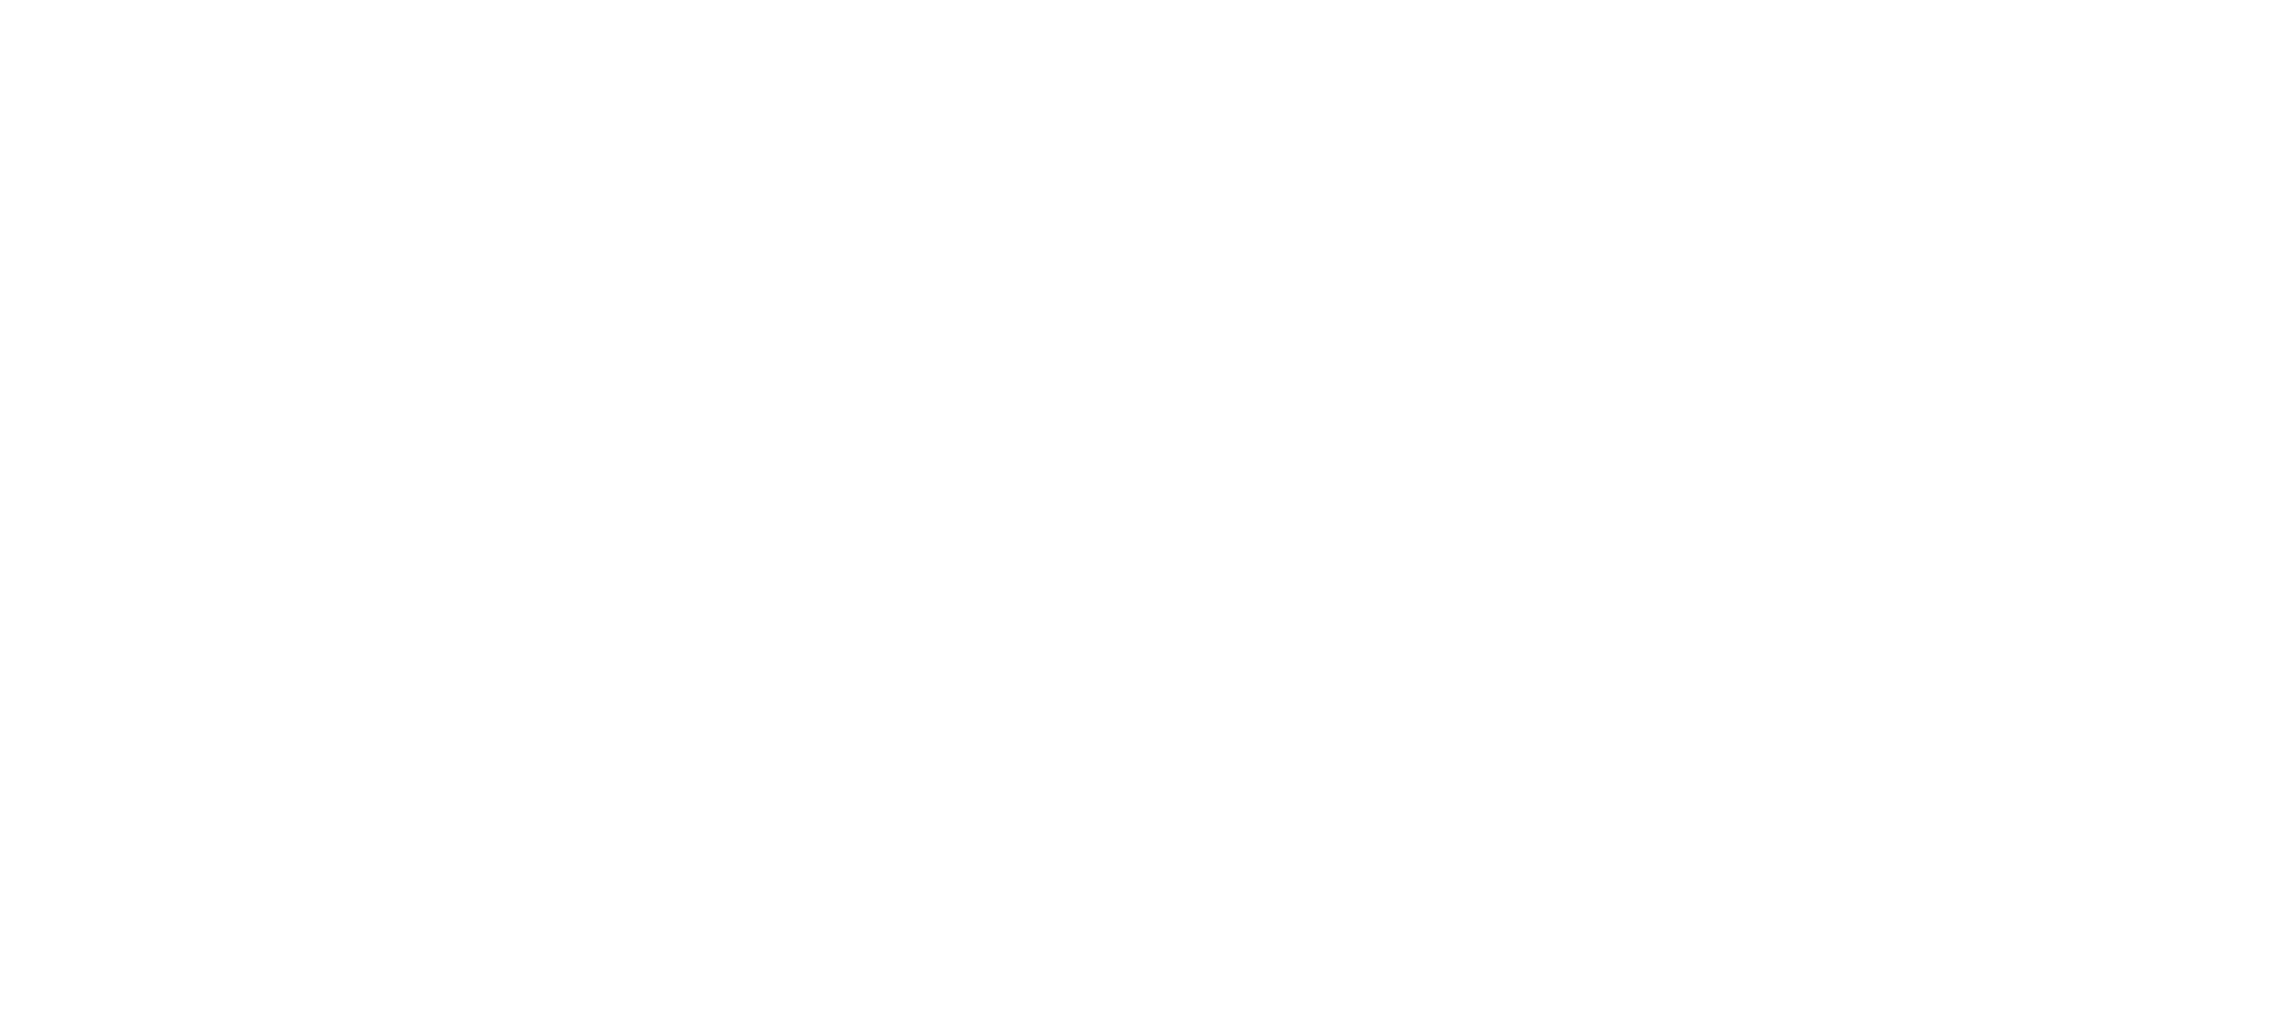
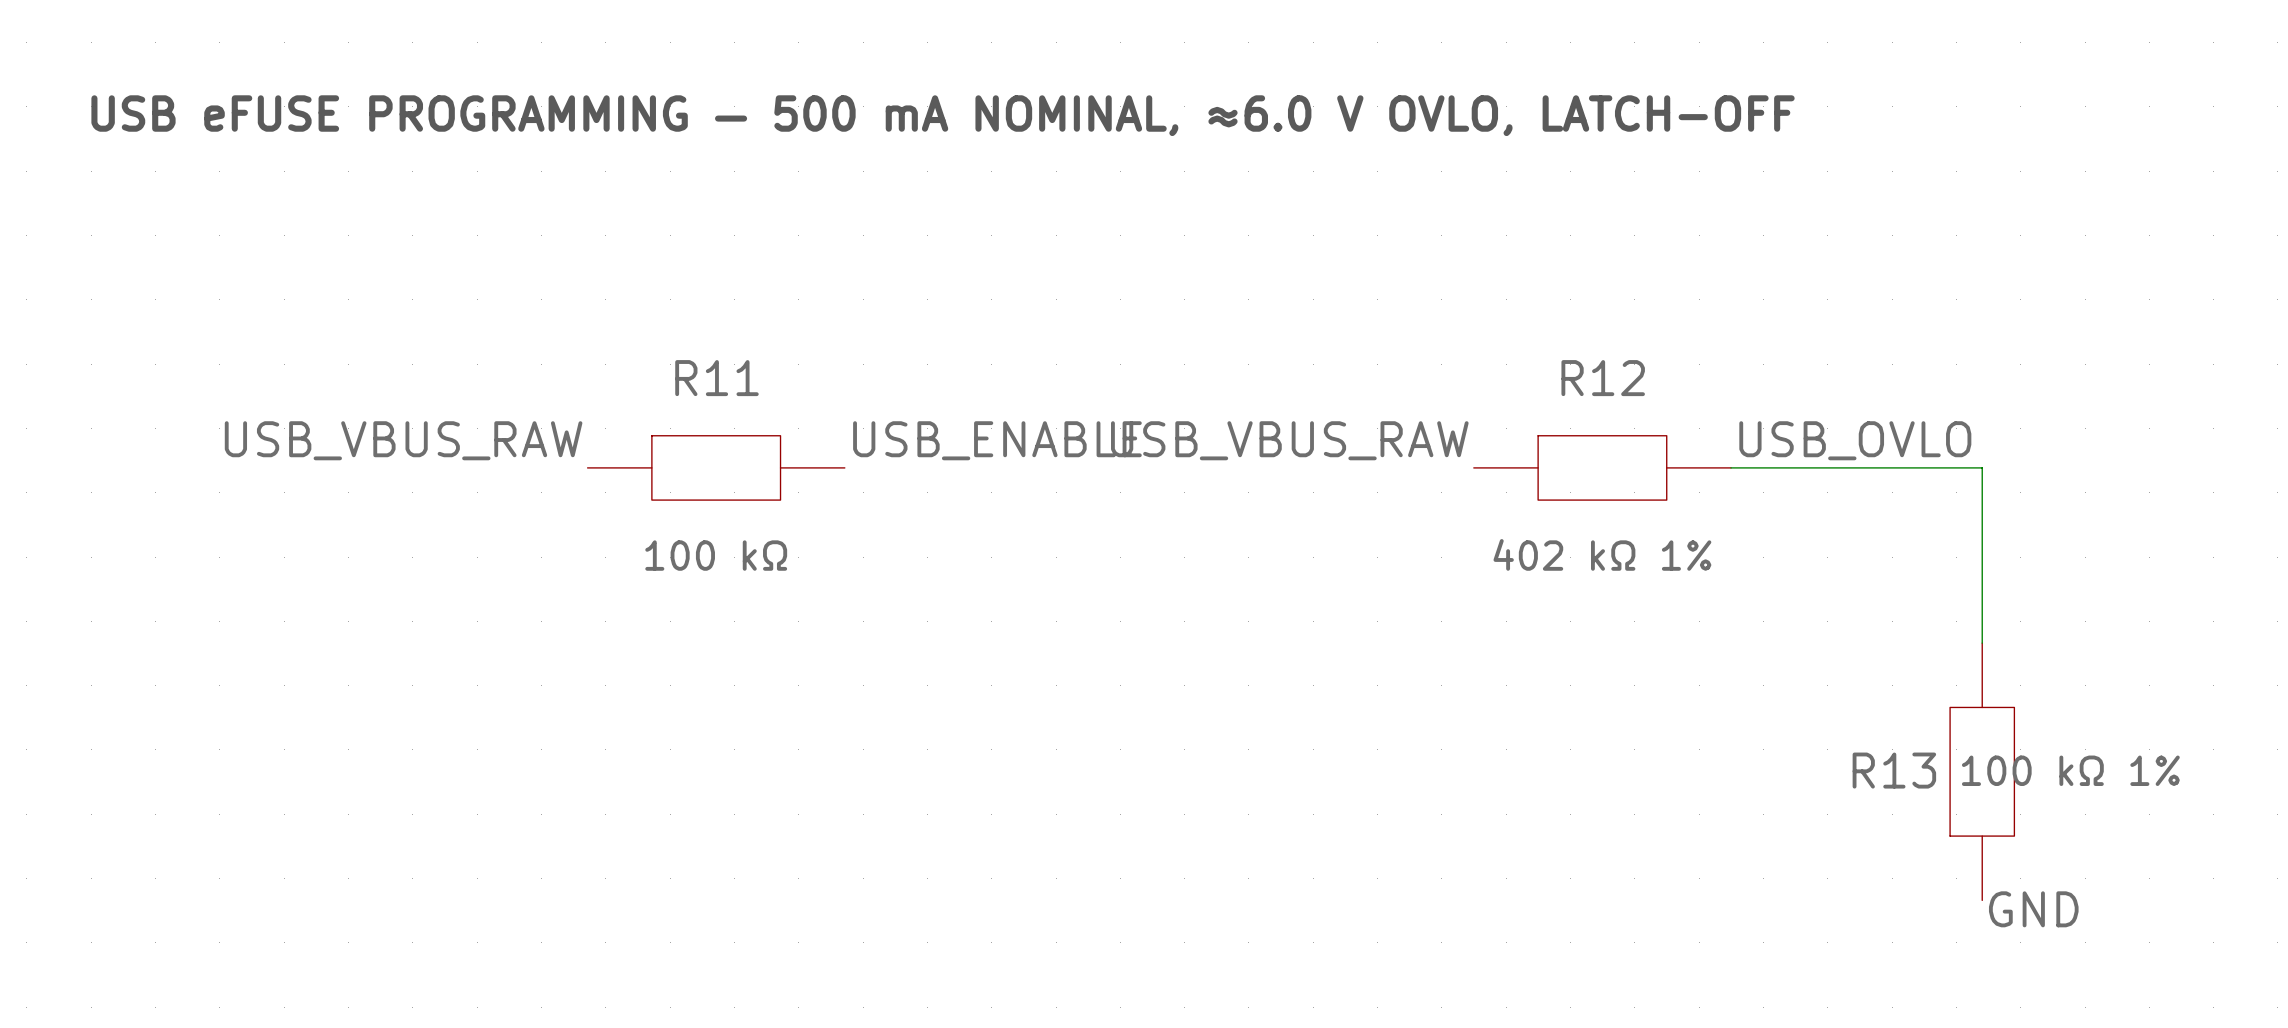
text: none -> USB eFUSE PROGRAMMING — 500 mA NOMINAL, ≈6.0 V OVLO, LATCH-OFF (943, 115)
label: none -> USB_VBUS_RAW (403, 440)
label: none -> USB_ENABLE (997, 440)
label: none -> USB_VBUS_RAW (1289, 440)
label: none -> USB_OVLO (1855, 440)
R11: none -> 100 kΩ (716, 467)
R12: none -> 402 kΩ 1% (1602, 467)
wire: none -> (1731, 467) (1982, 467) (1982, 643)
R13: none -> 100 kΩ 1% (1982, 771)
label: none -> GND (2033, 909)

